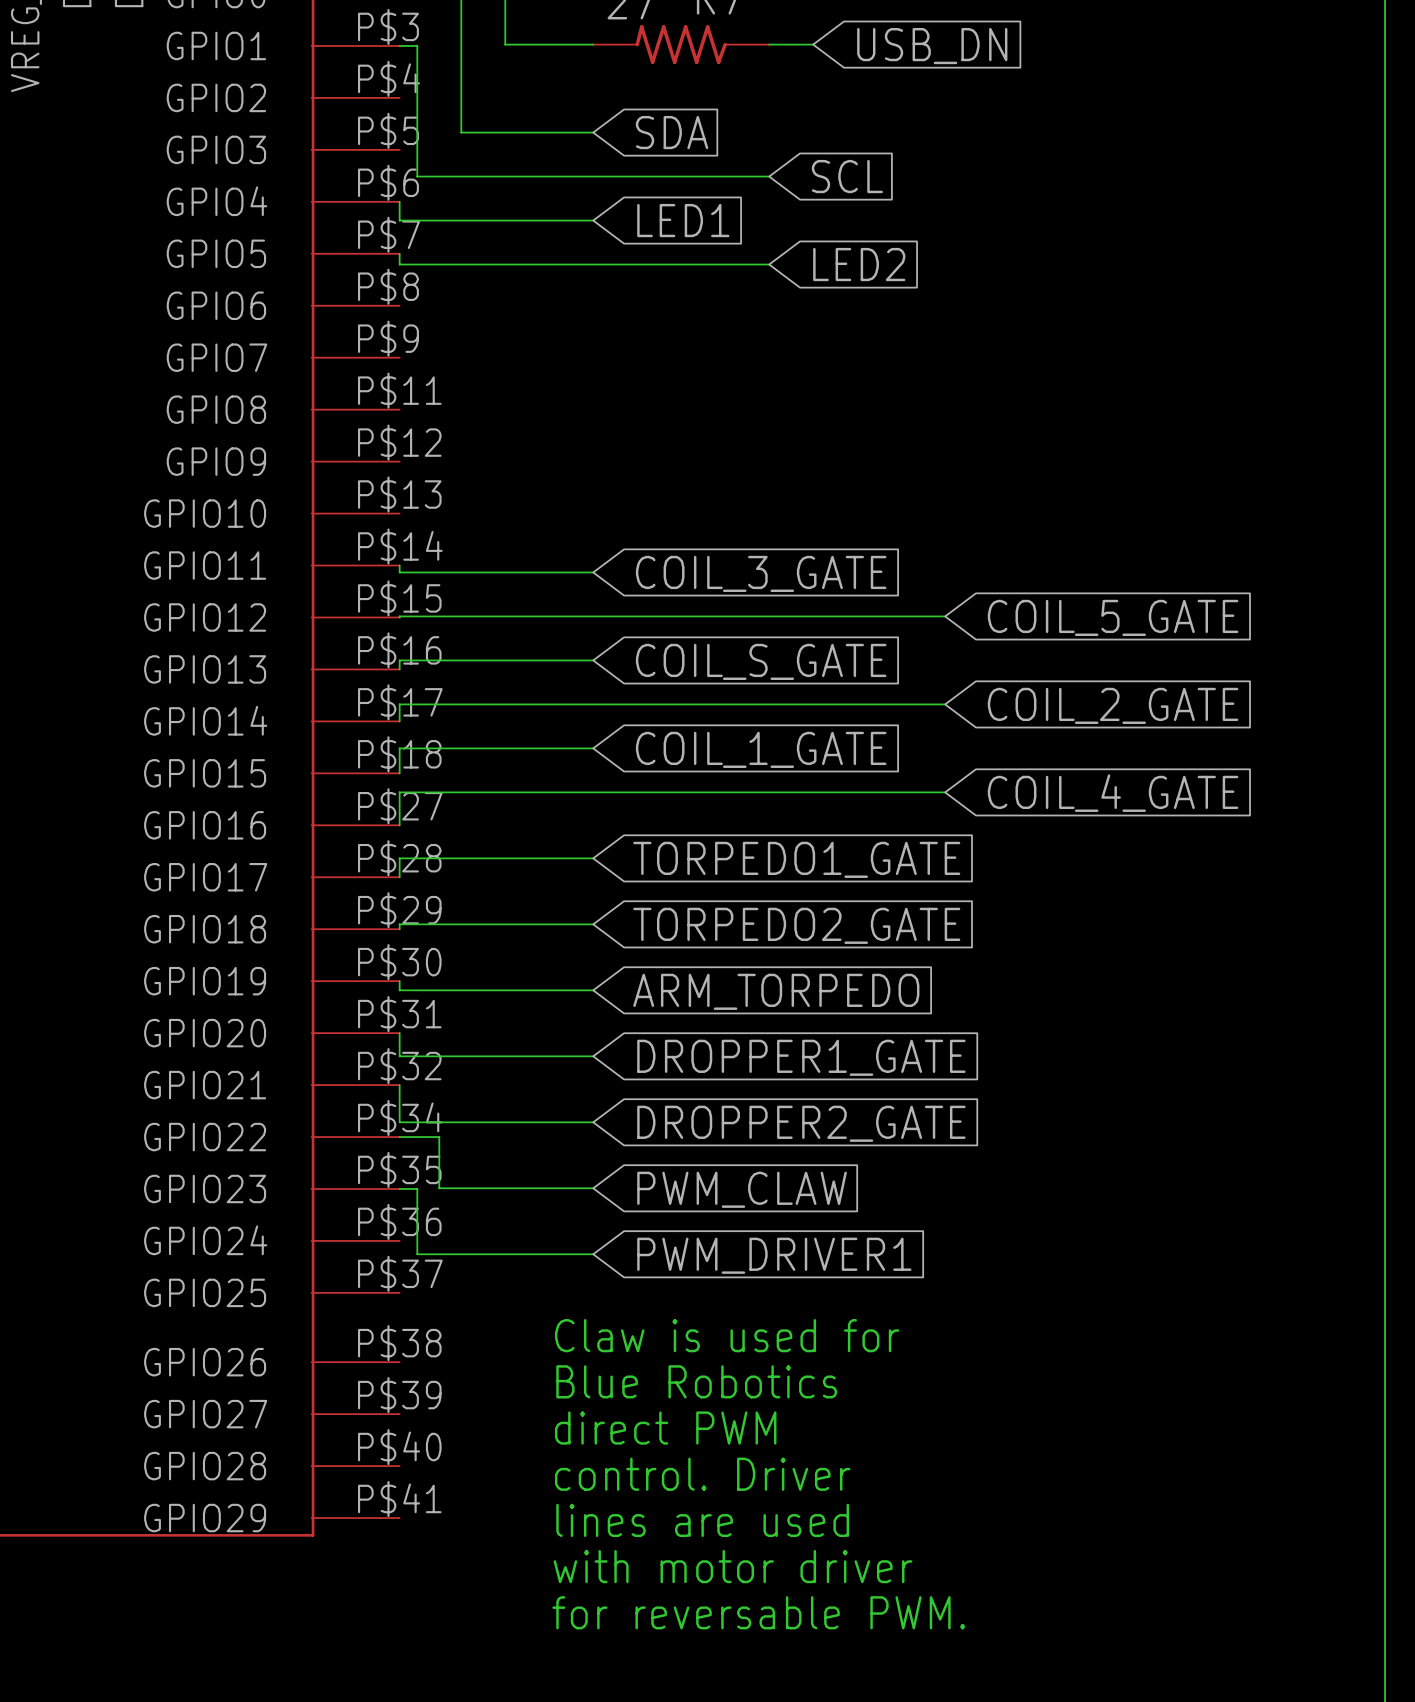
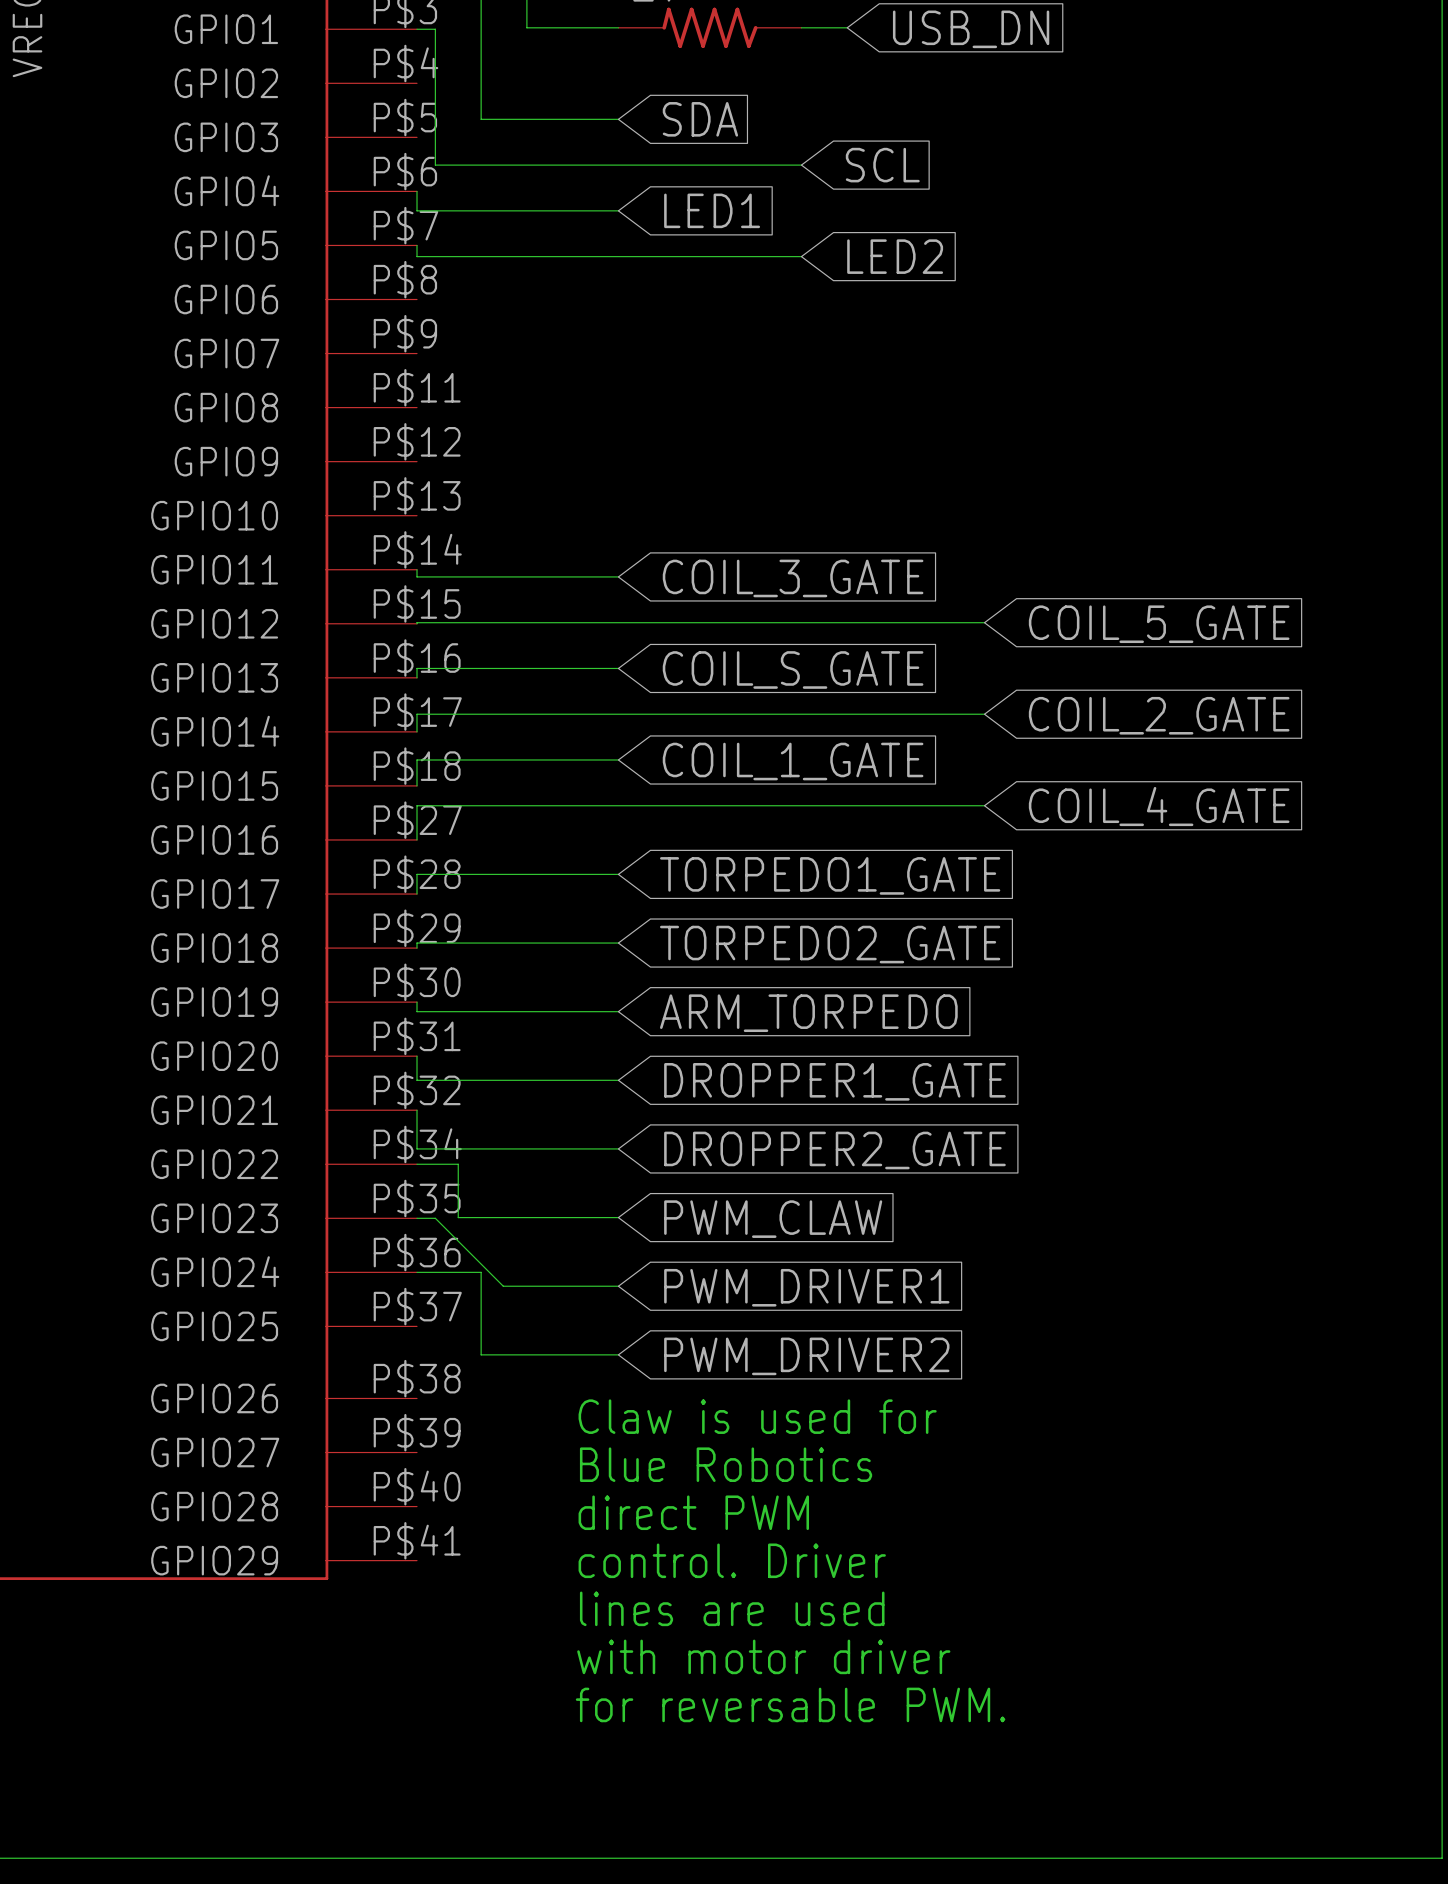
wire: (417, 1188) (417, 1254) (482, 1254) -> (435, 1218) (503, 1286)
wire: none -> (417, 1272) (481, 1272) (481, 1354) (618, 1354)
global label: none -> PWM_DRIVER2 (806, 1356)
text: Claw is used for (727, 1335) -> none
text: Blue Robotics (696, 1381) -> Claw is used for (757, 1416)
text: direct PWM (665, 1428) -> Blue Robotics (726, 1464)
text: control. Driver (702, 1474) -> direct PWM (693, 1512)
text: lines are used (702, 1520) -> control. Driver (732, 1560)
text: with motor driver (733, 1566) -> lines are used (732, 1608)
text: for reversable PWM. (758, 1612) -> with motor driver (763, 1656)
text: none -> for reversable PWM. (790, 1704)

